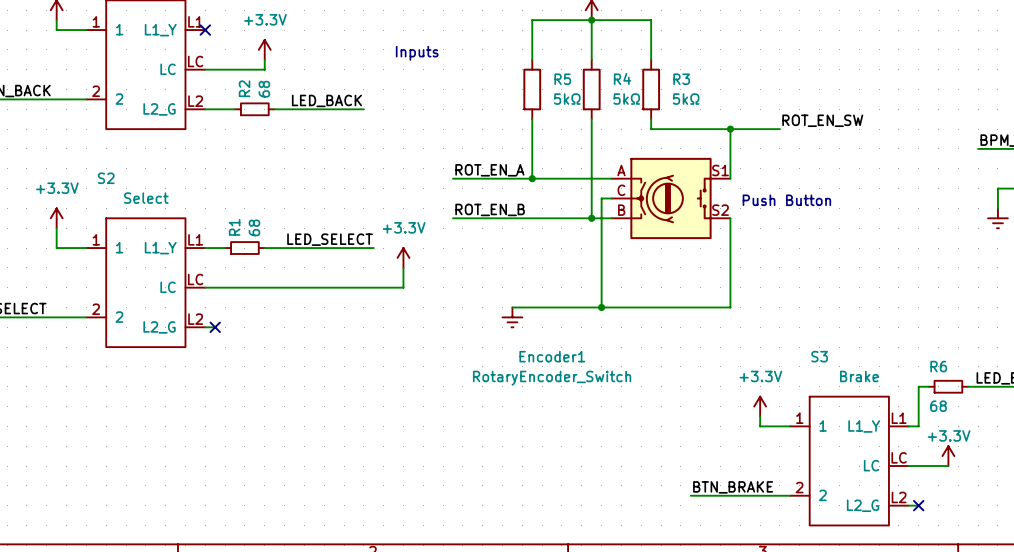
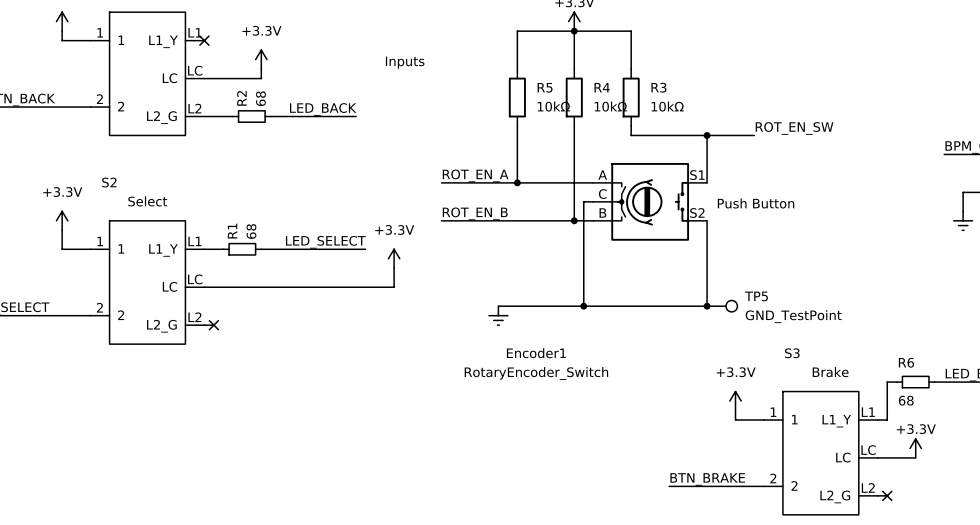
R5 value: 5kΩ (567, 99) -> 10kΩ (553, 106)
R4 value: 5kΩ (626, 99) -> 10kΩ (610, 106)
R3 value: 5kΩ (686, 99) -> 10kΩ (667, 106)
junction: none -> (707, 306)
TP5: none -> GND_TestPoint (722, 306)

